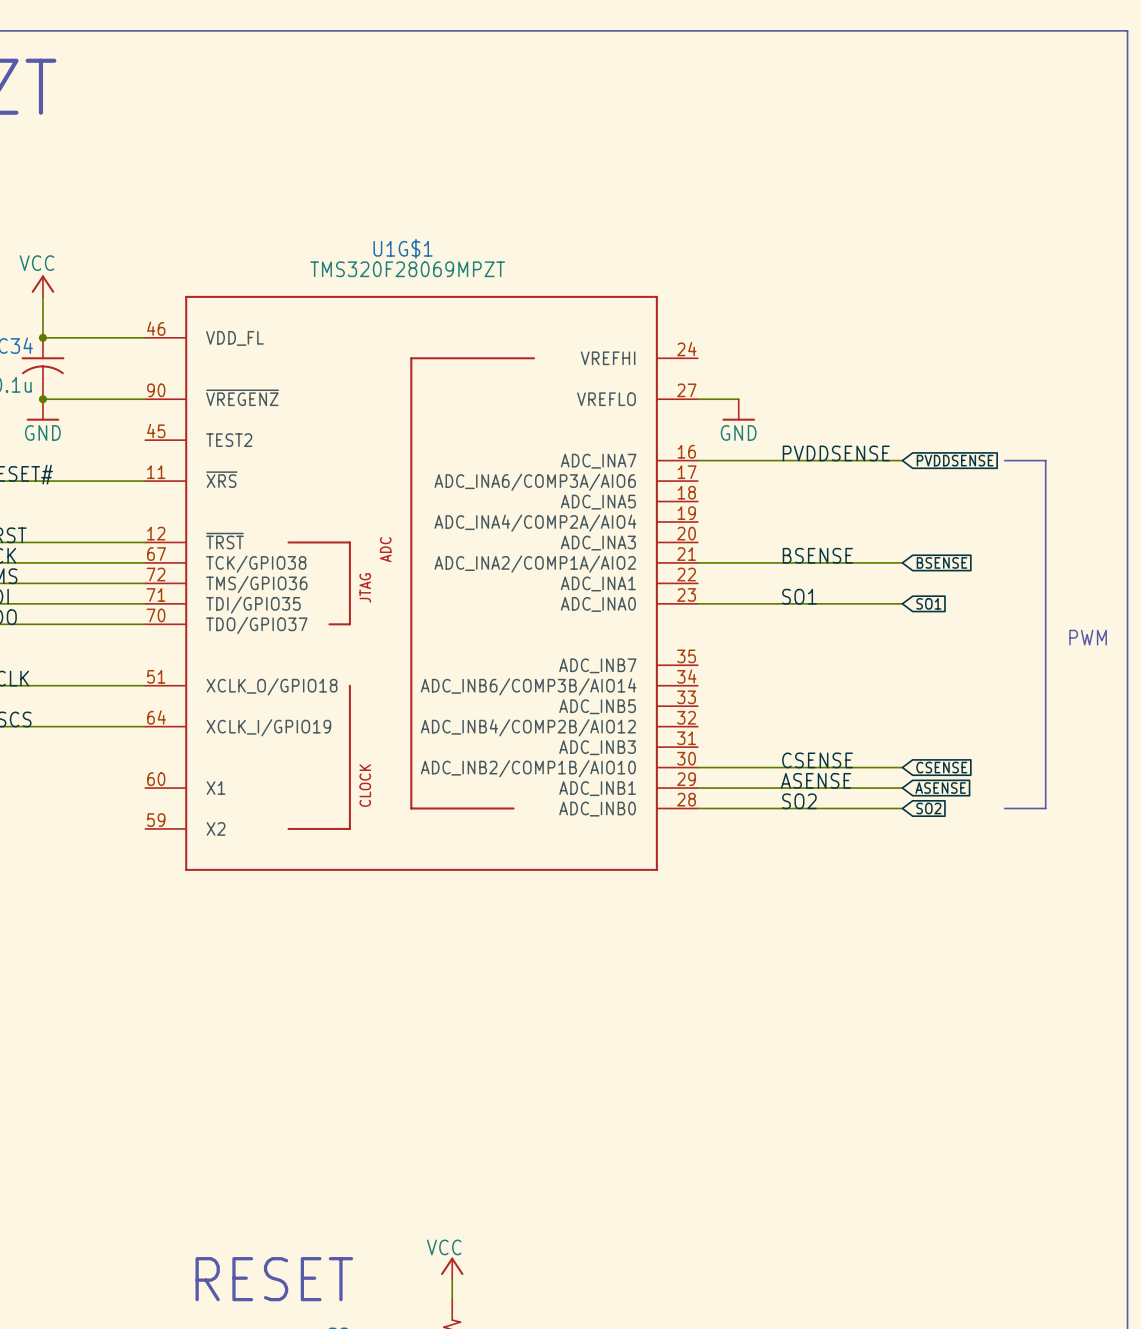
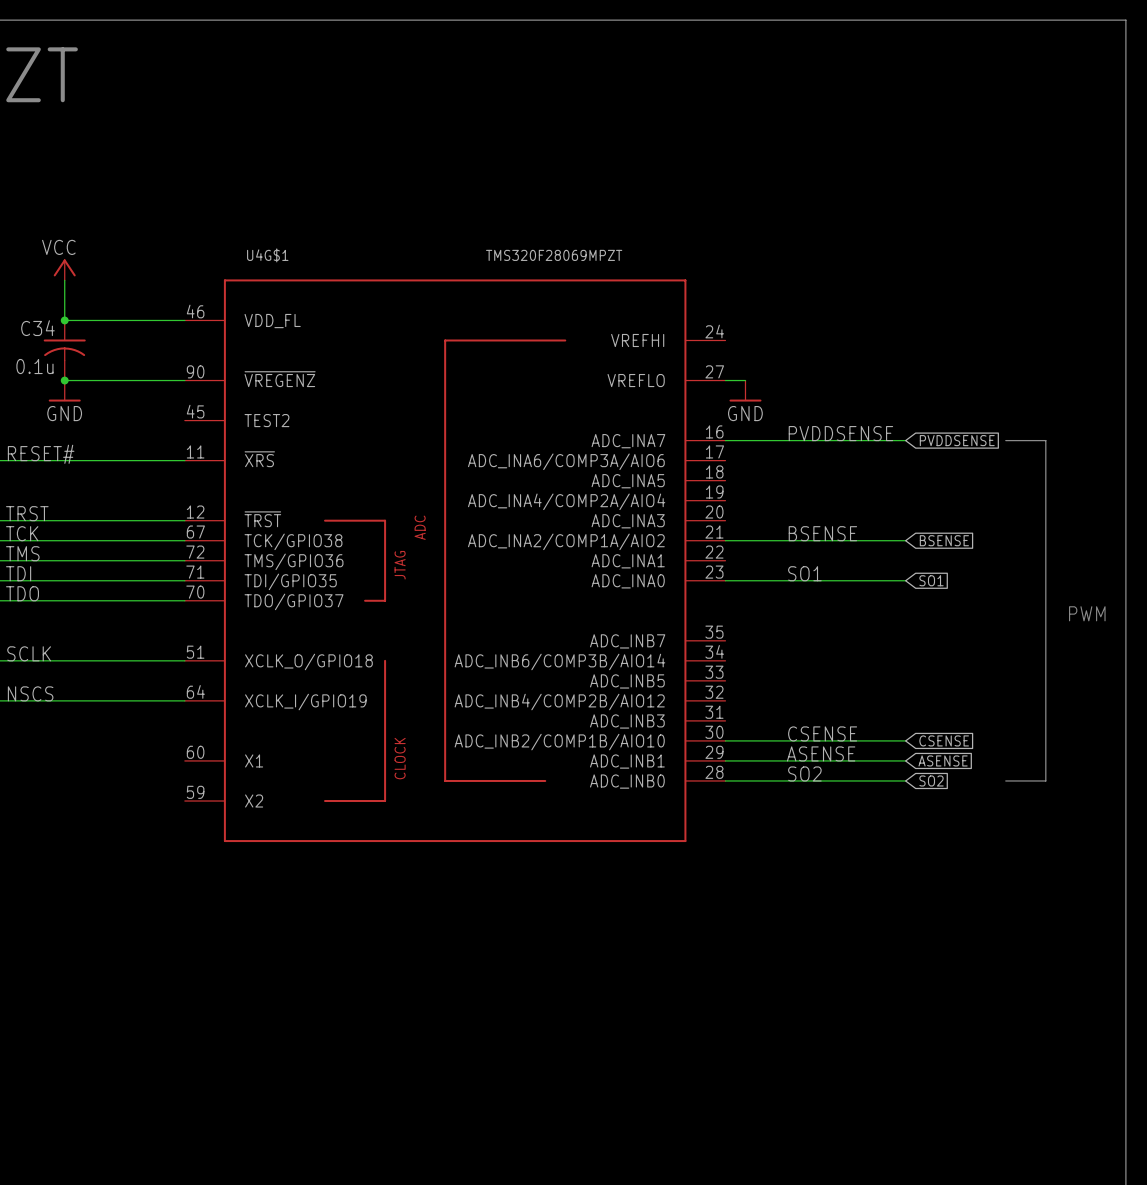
U1G$1: TMS320F28069MPZT (421, 583) -> none
U4G$1: none -> TMS320F28069MPZT (455, 560)

